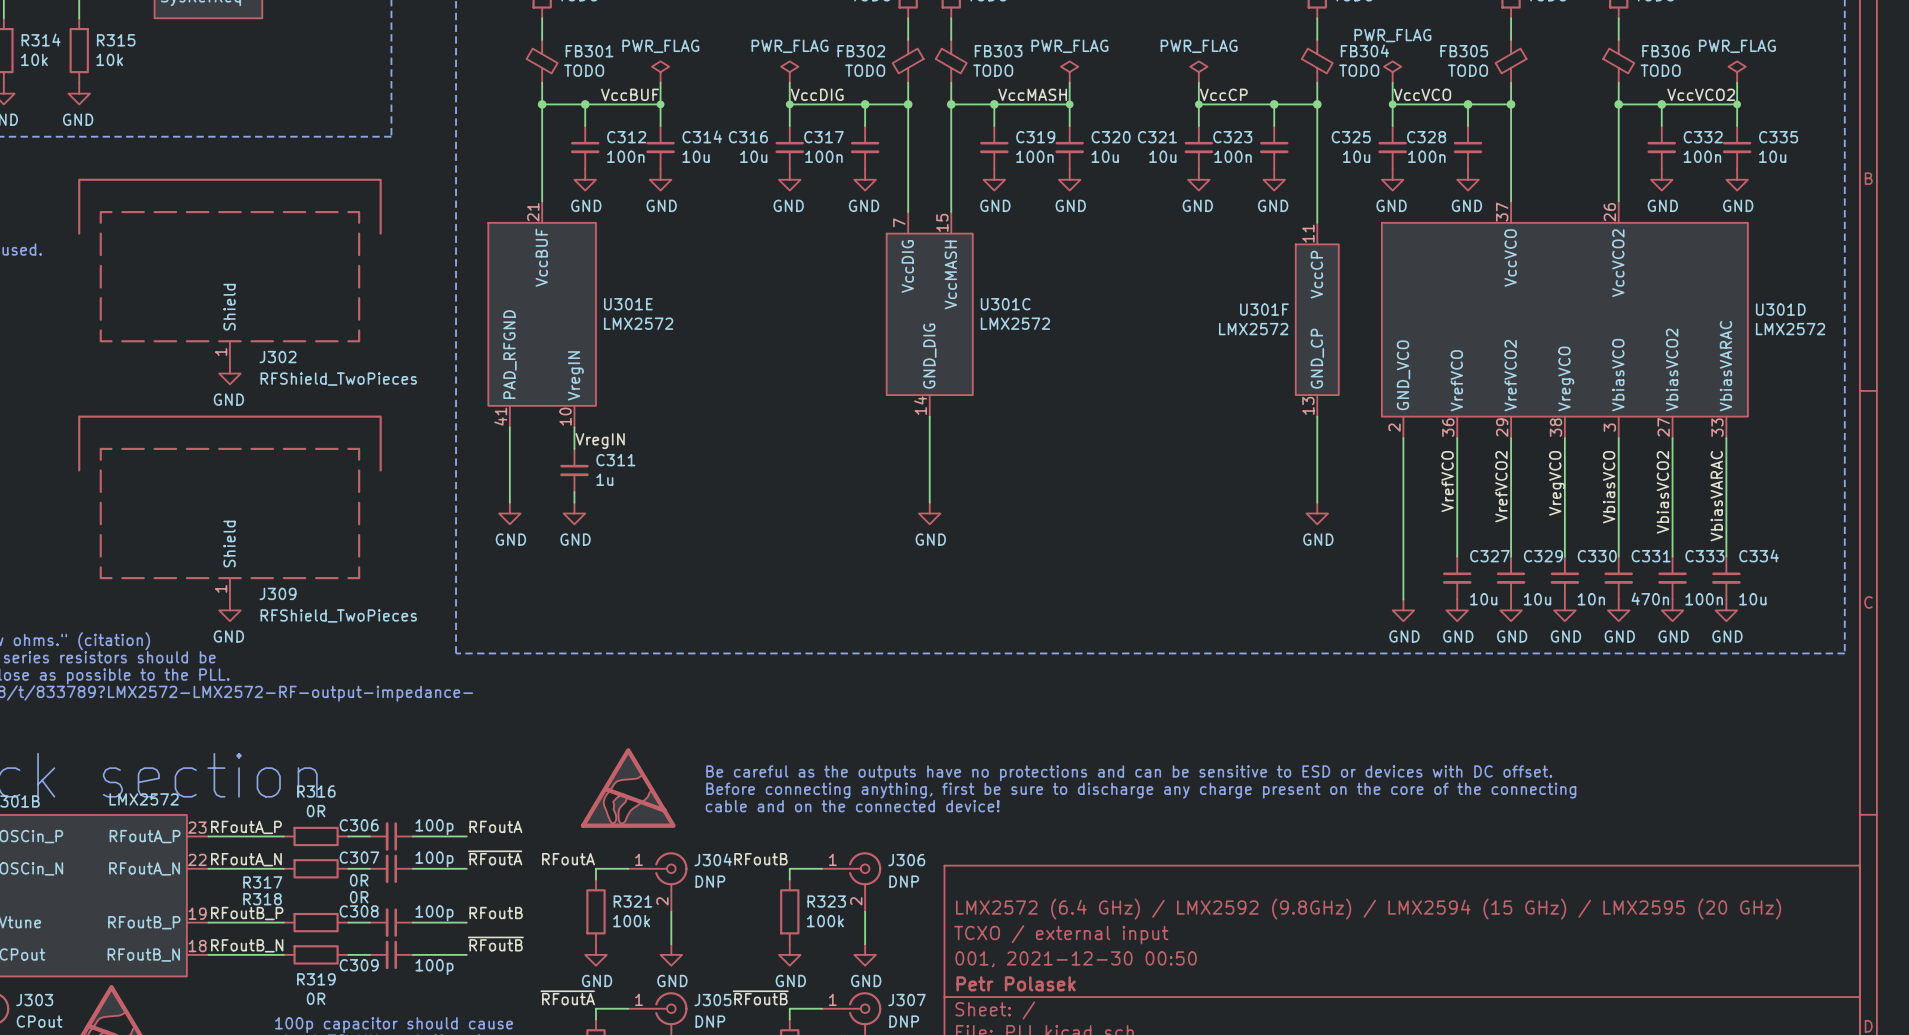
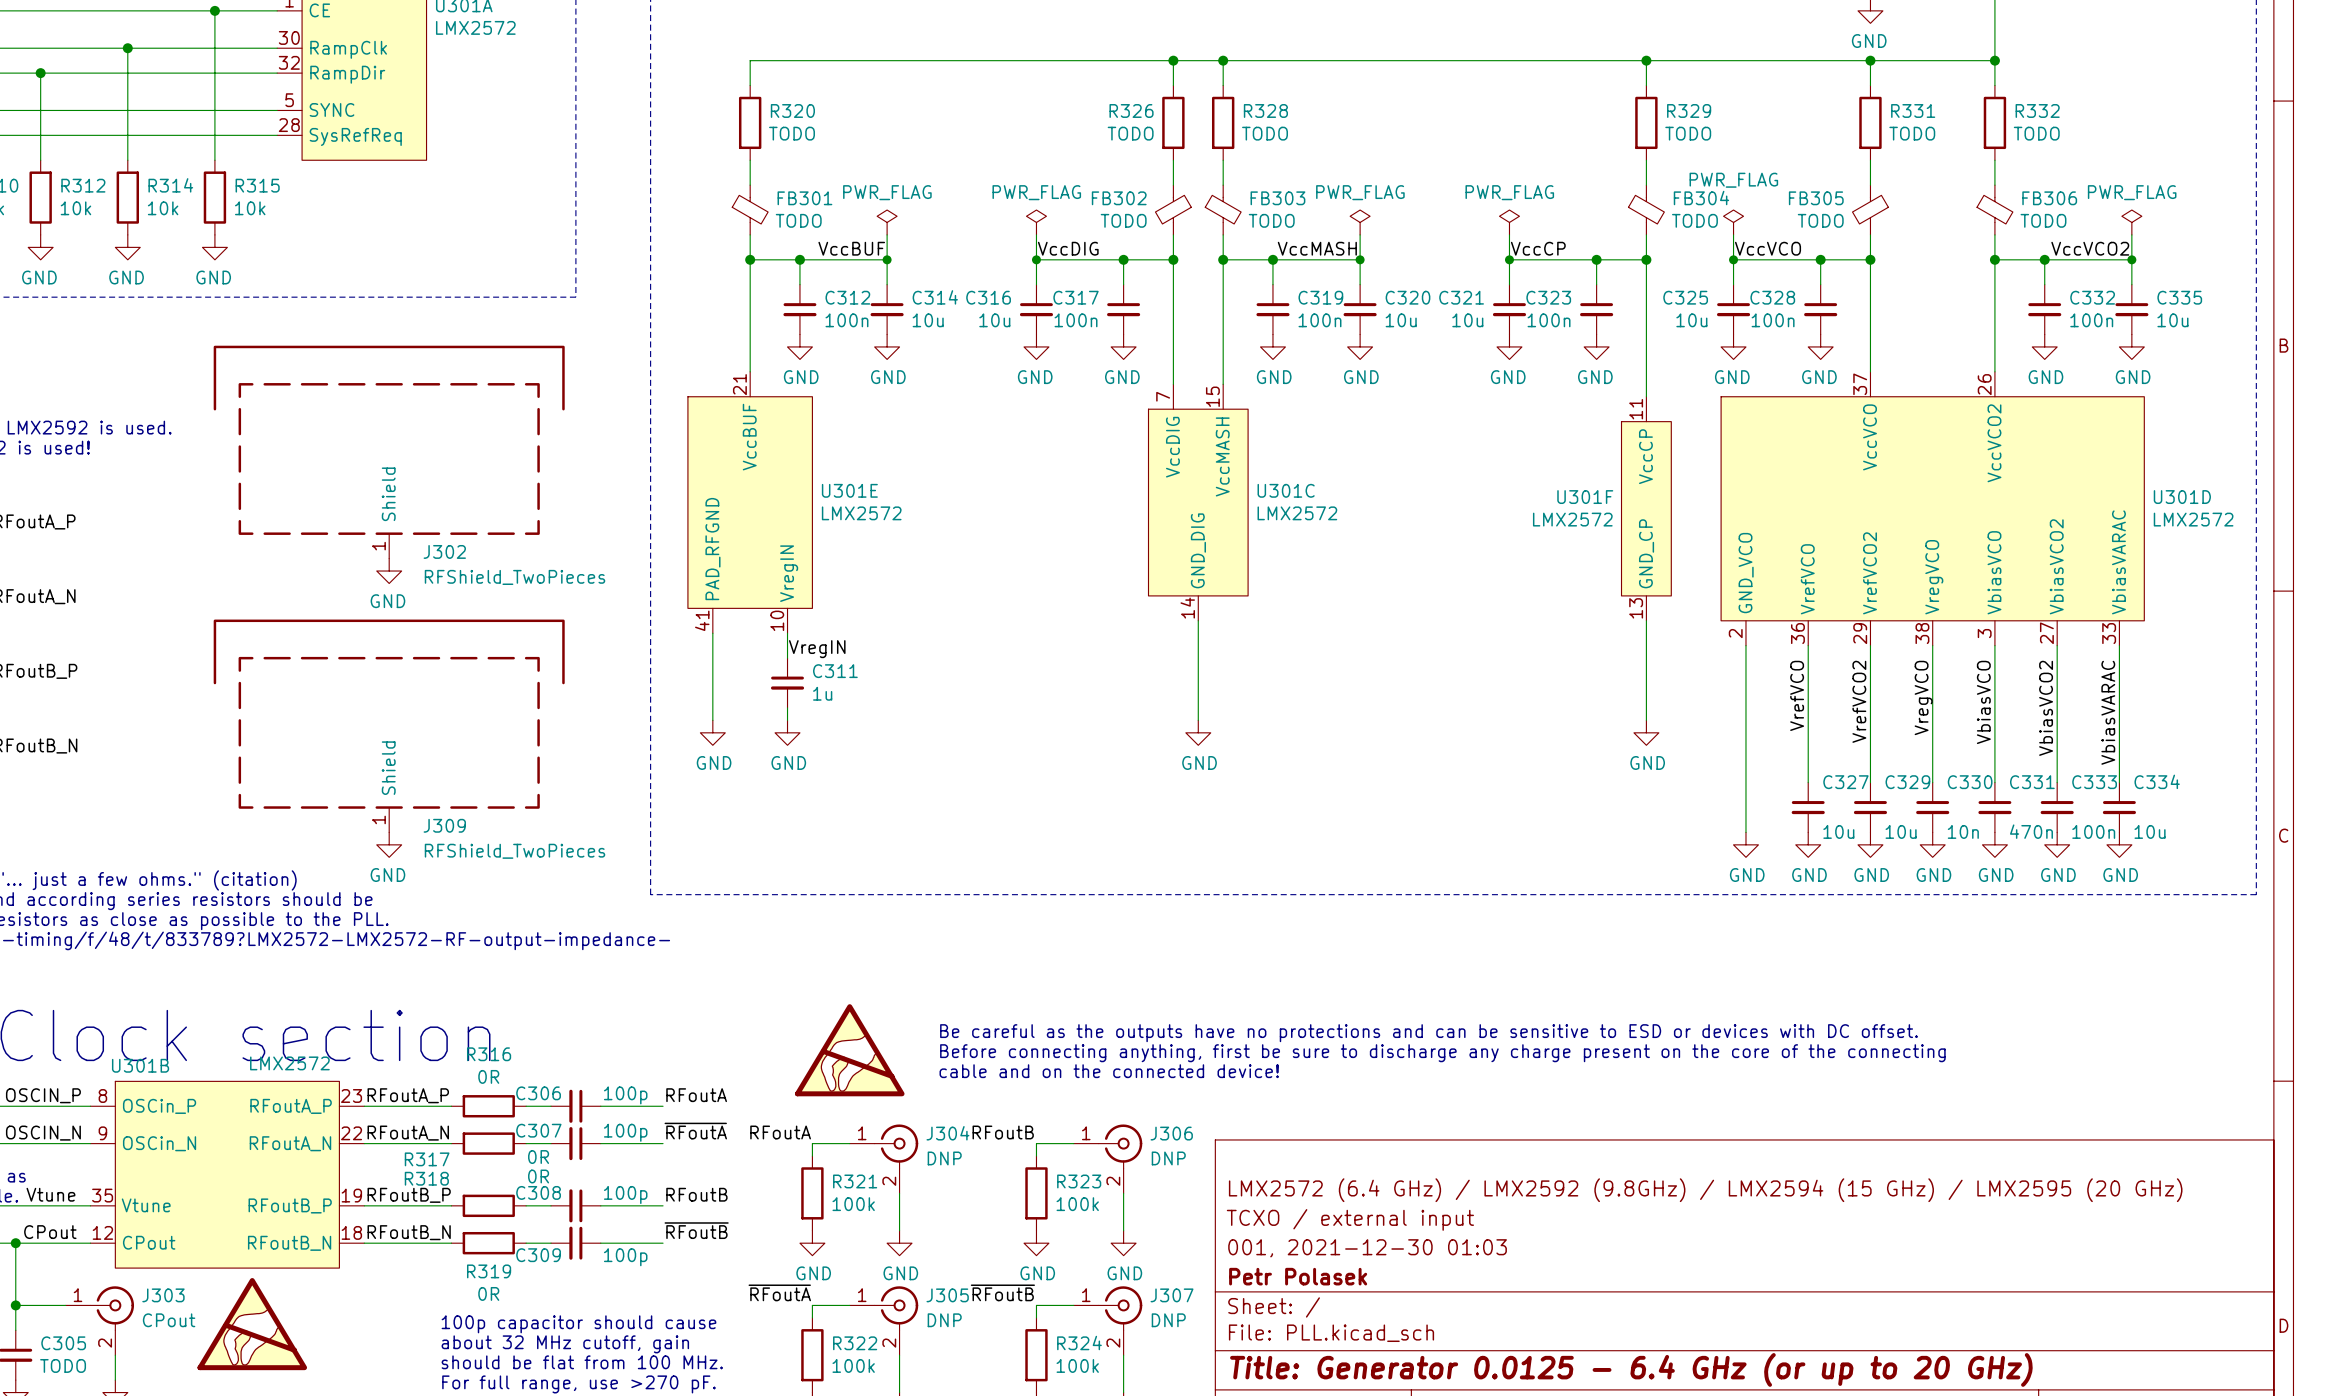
title block: 001, 2021-12-30 00:50 (1076, 959) -> 001, 2021-12-30 01:03 (1367, 1248)

